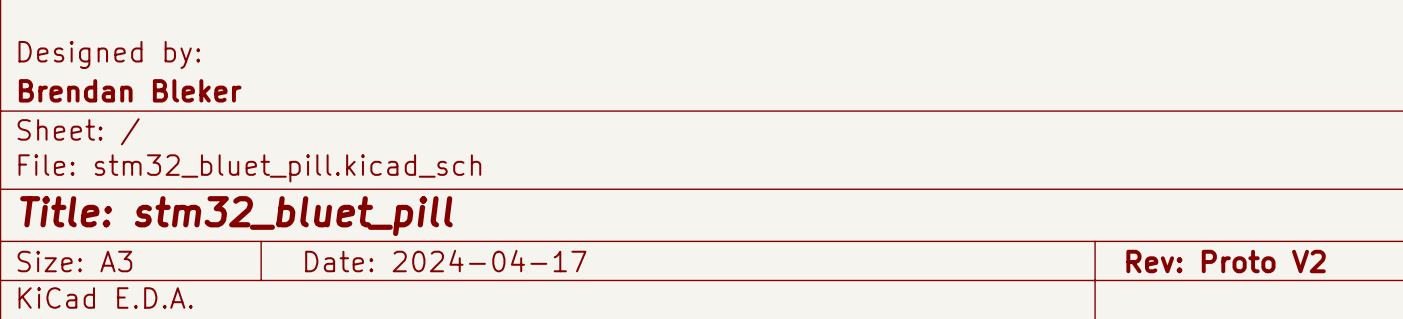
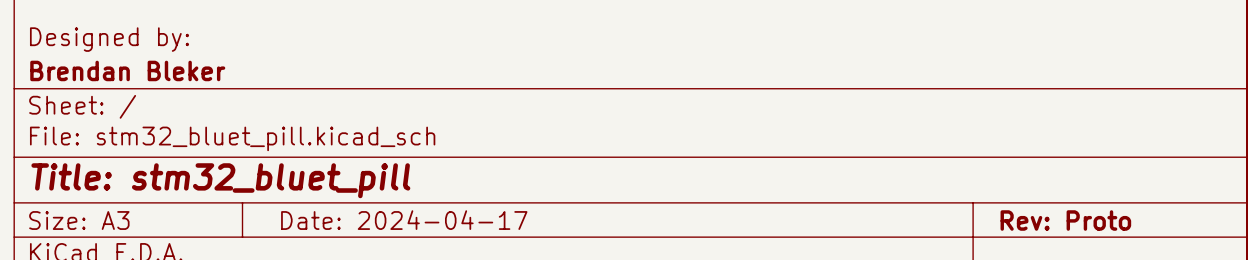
title block: Rev: Proto V2 (1226, 261) -> Rev: Proto (1065, 220)

